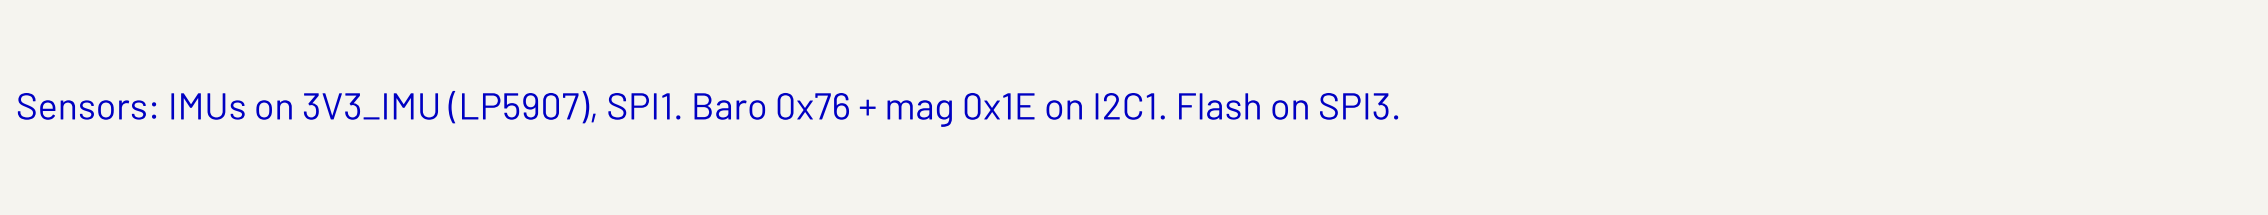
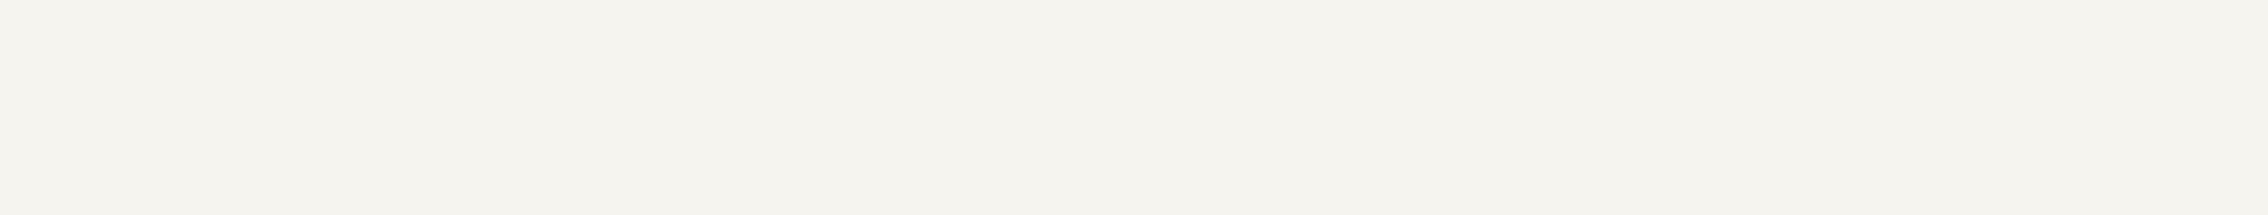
text: Sensors: IMUs on 3V3_IMU (LP5907), SPI1. Baro 0x76 + mag 0x1E on I2C1. Flash on SPI3. (708, 108) -> none

